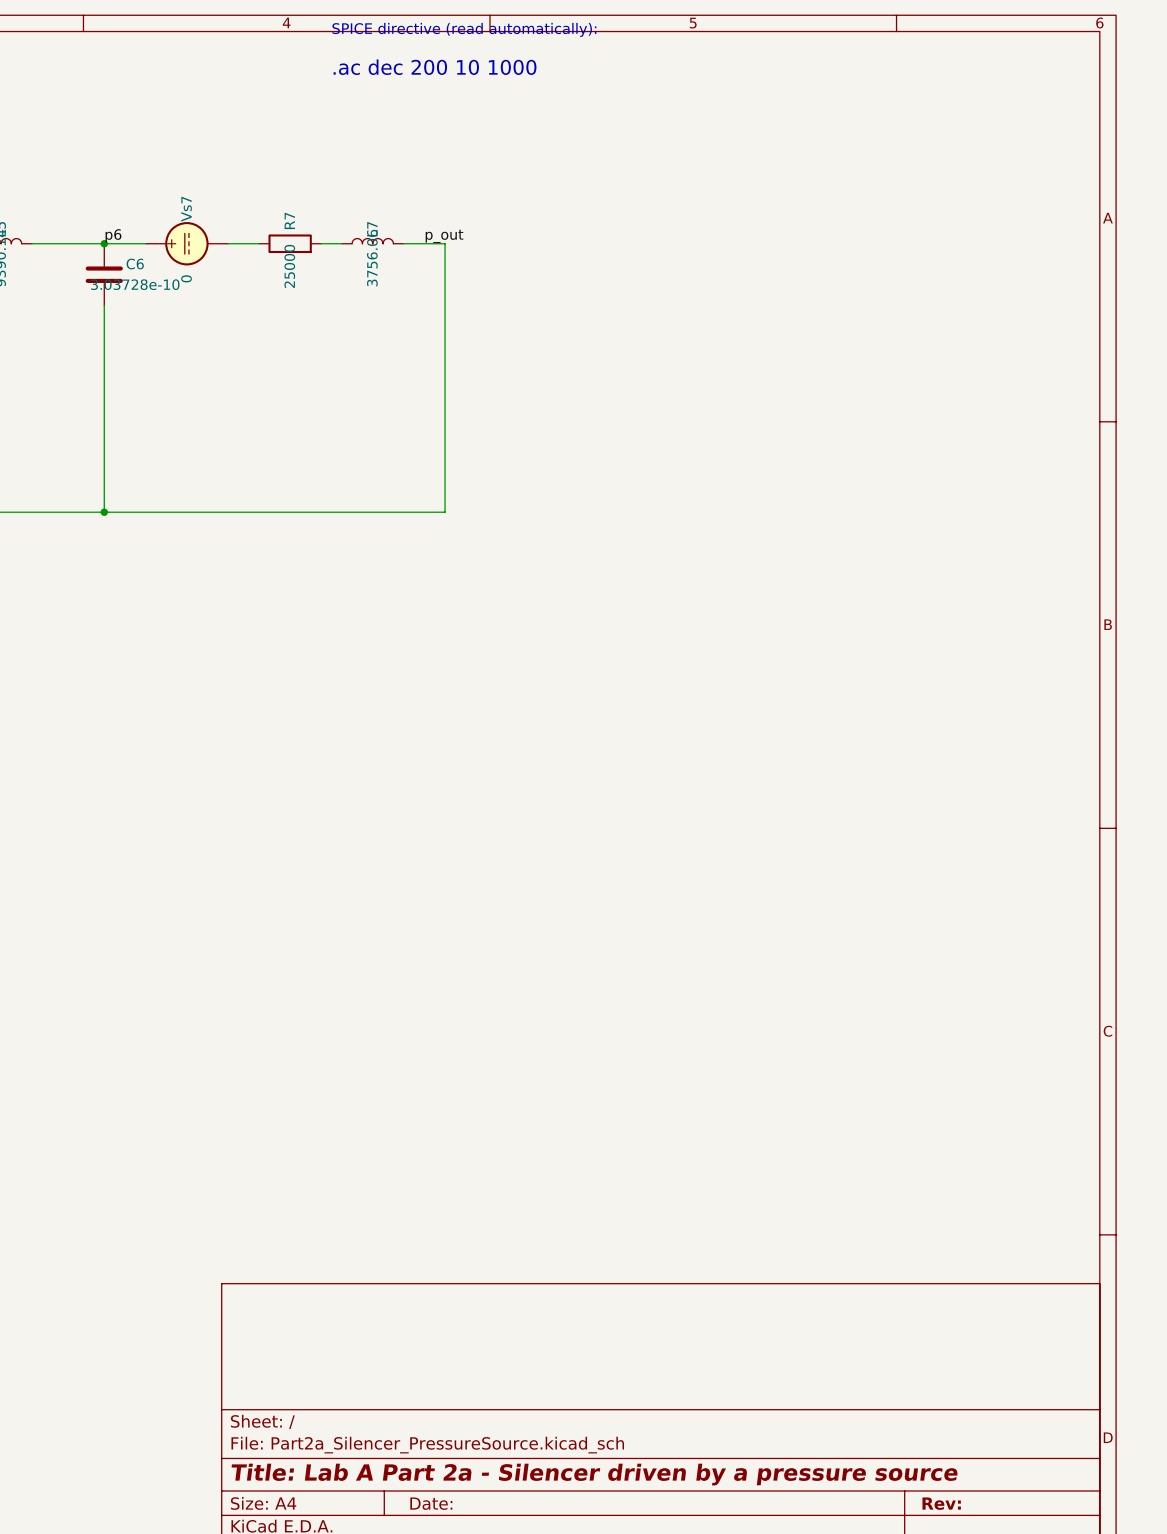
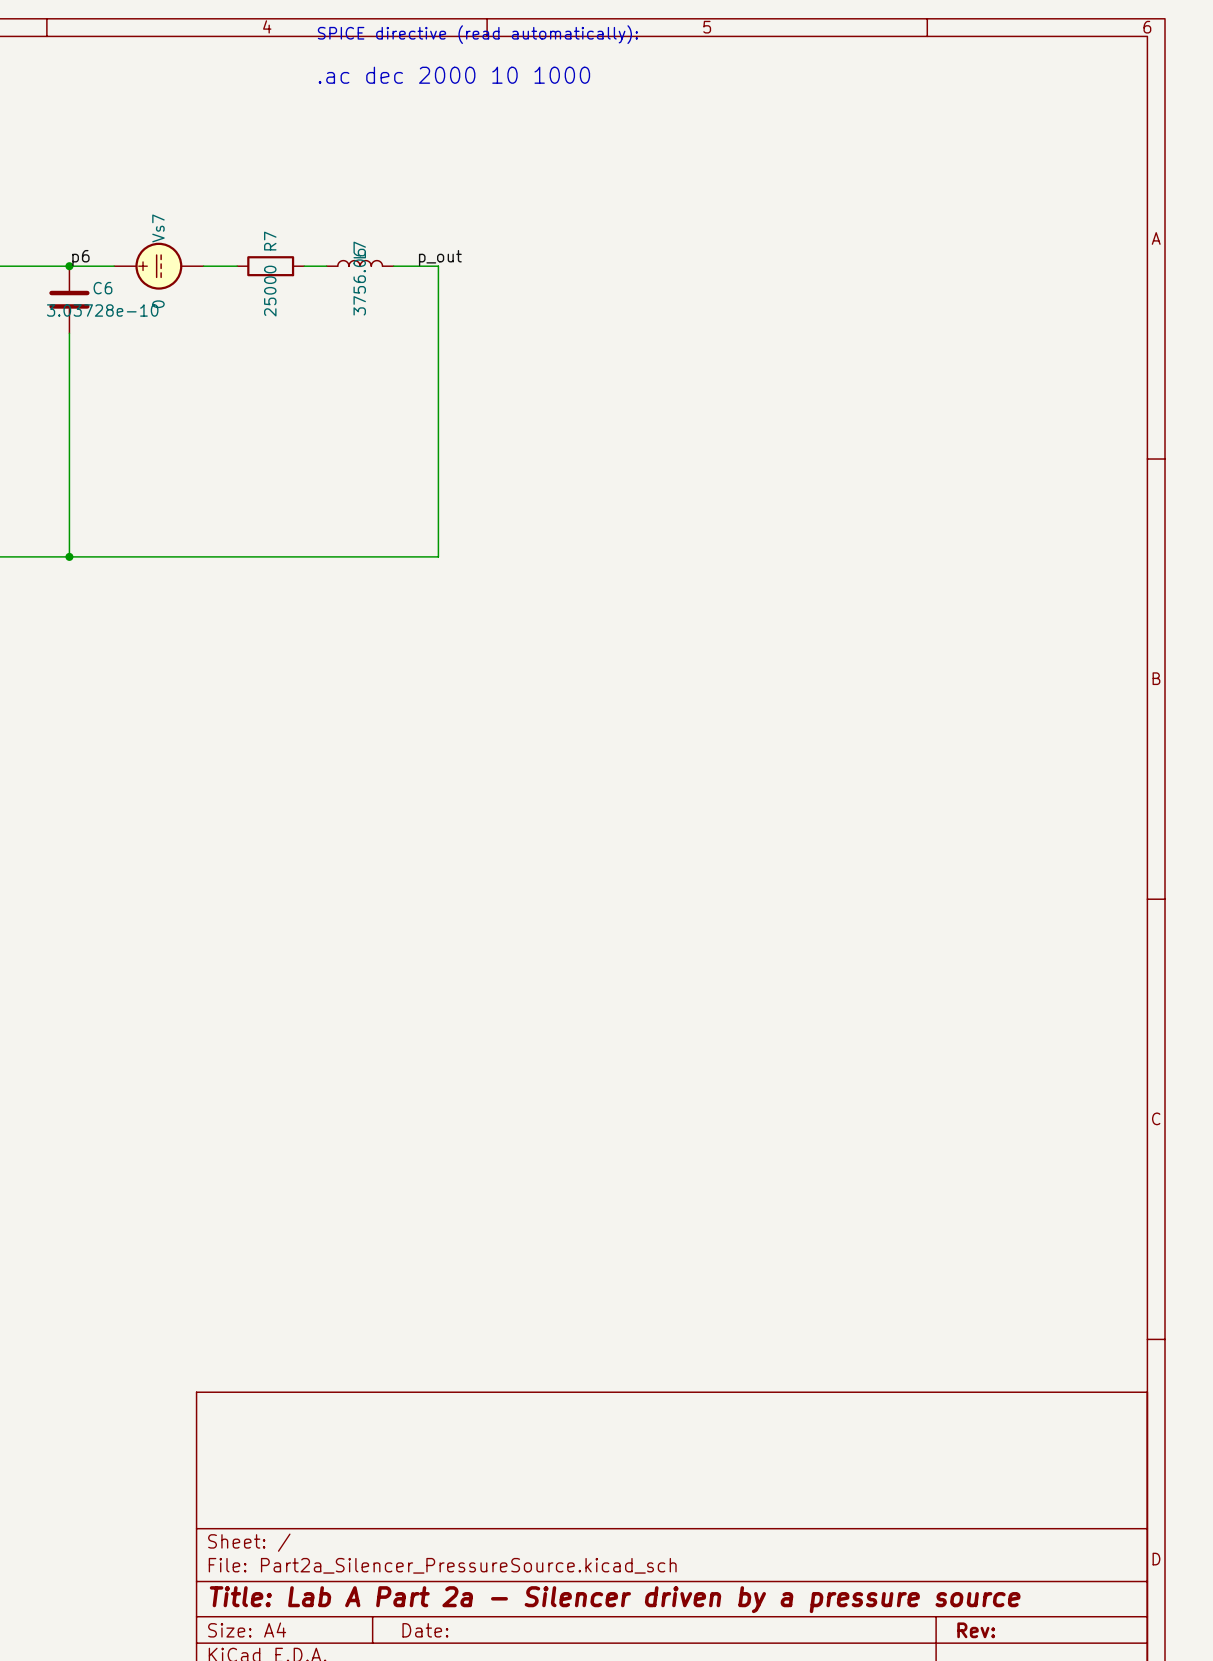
text: .ac dec 200 10 1000 (435, 67) -> .ac dec 2000 10 1000 (454, 75)

